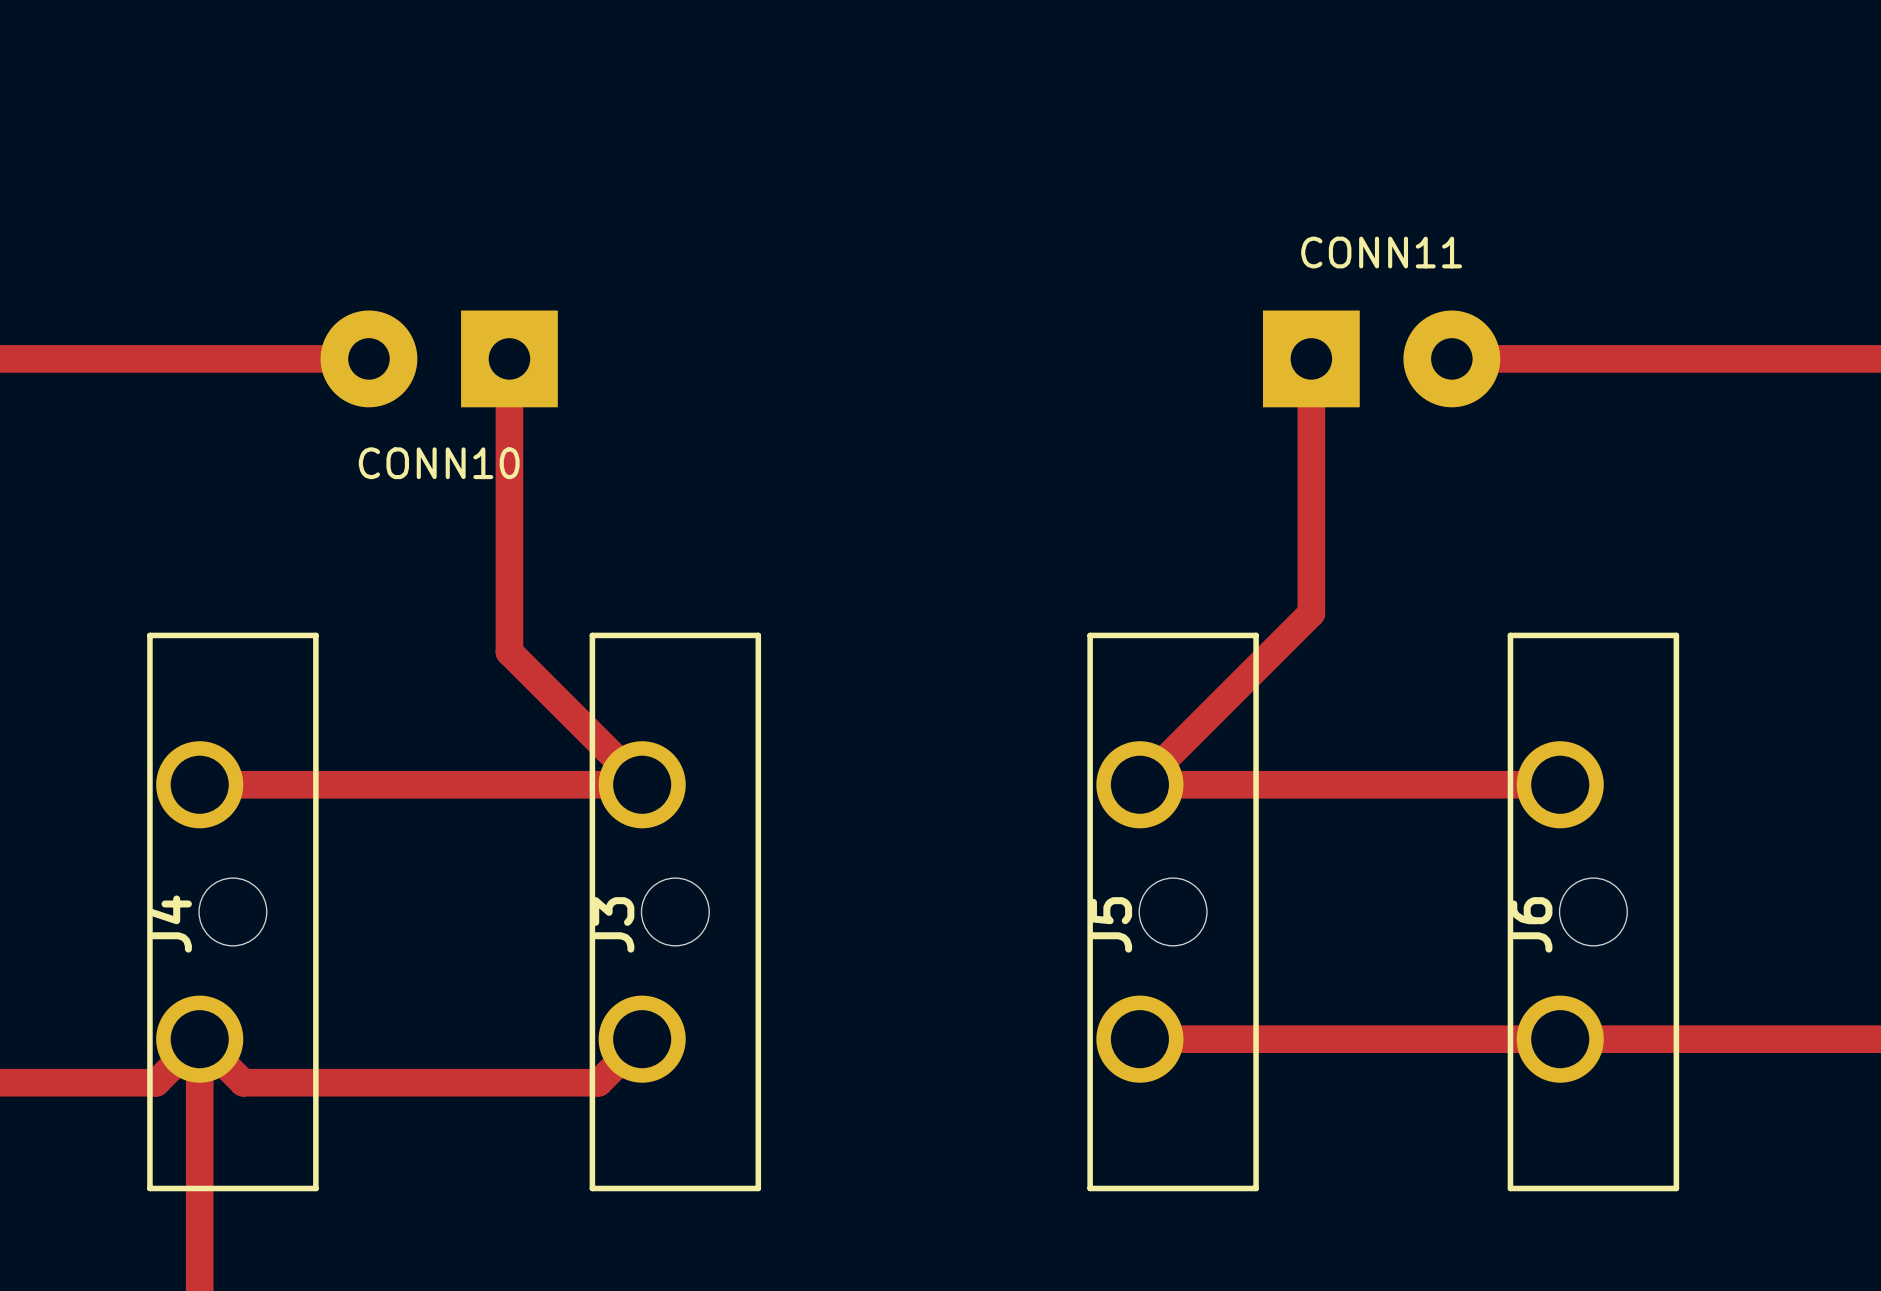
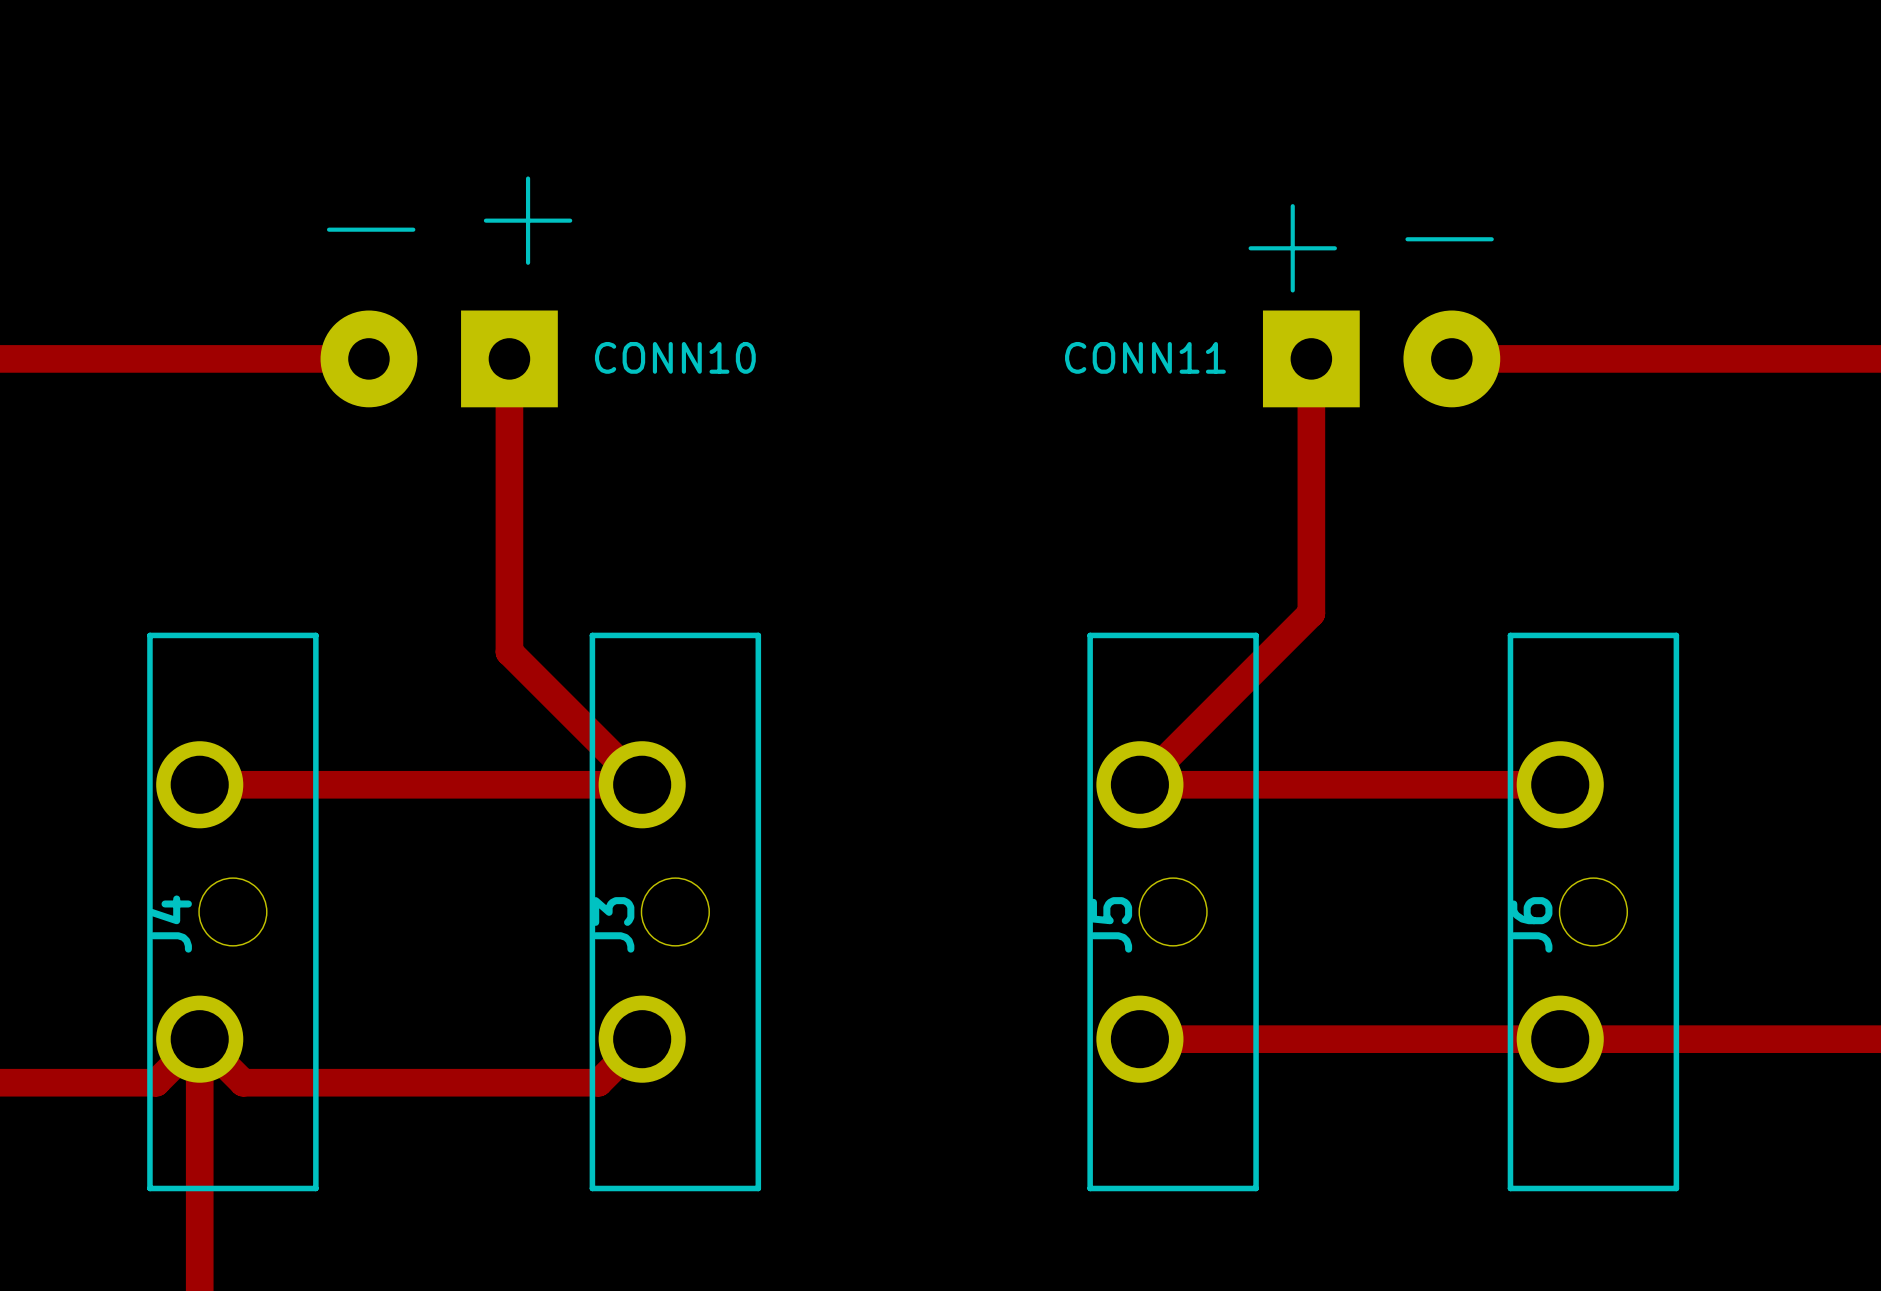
text: none -> + (528, 220)
text: none -> - (371, 229)
text: none -> - (1449, 239)
text: none -> + (1292, 248)
CONN11 name position: CONN11 (1381, 252) -> CONN11 (1145, 357)
CONN10 name position: CONN10 (439, 463) -> CONN10 (675, 357)

